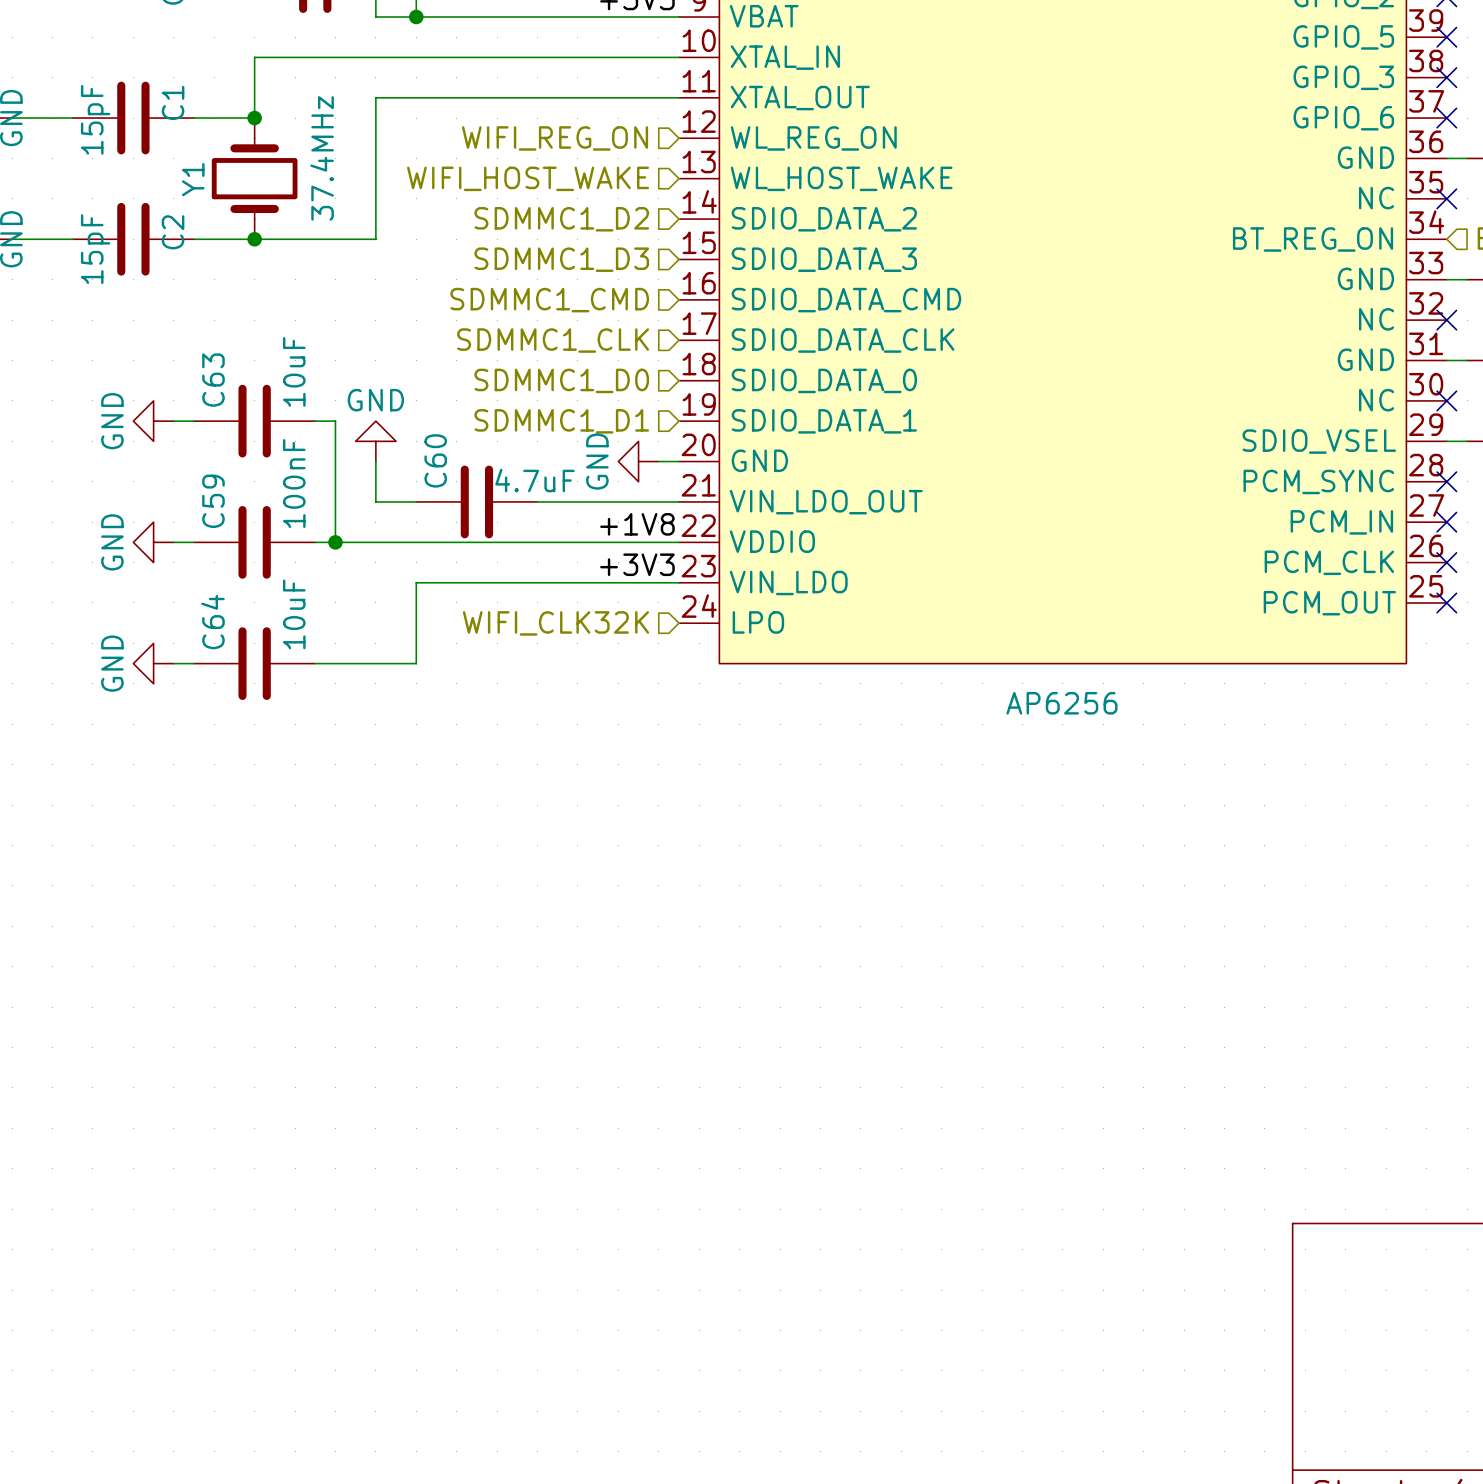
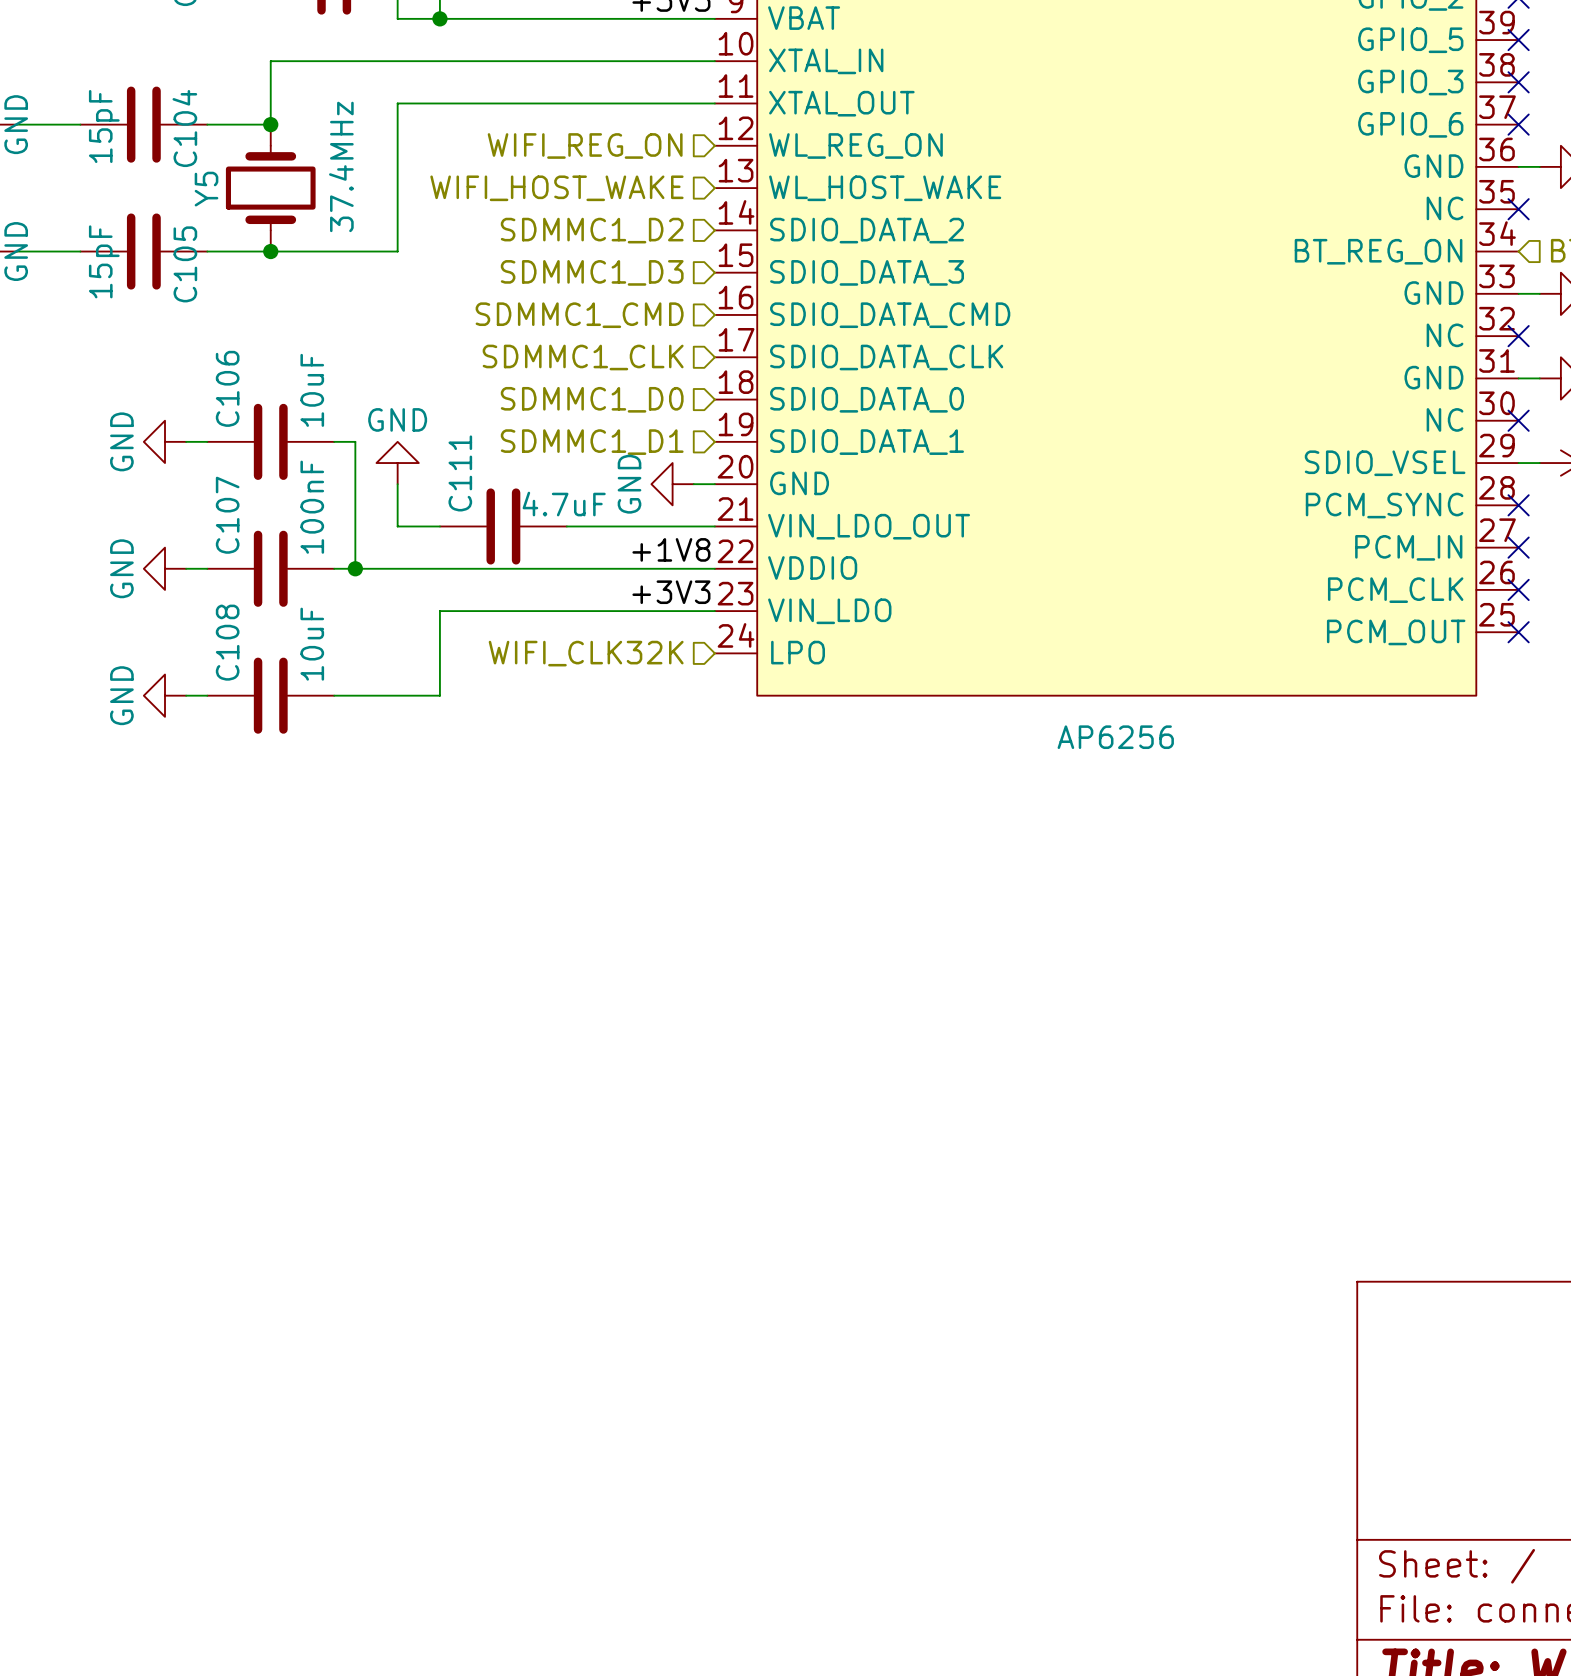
C1 name: C1 (173, 102) -> C104 (184, 128)
Y1 name: Y1 (193, 179) -> Y5 (206, 189)
C2 name: C2 (173, 232) -> C105 (185, 264)
C63 name: C63 (213, 380) -> C106 (227, 388)
C60 name: C60 (435, 460) -> C111 (460, 473)
C59 name: C59 (213, 501) -> C107 (227, 515)
C64 name: C64 (212, 622) -> C108 (227, 642)

